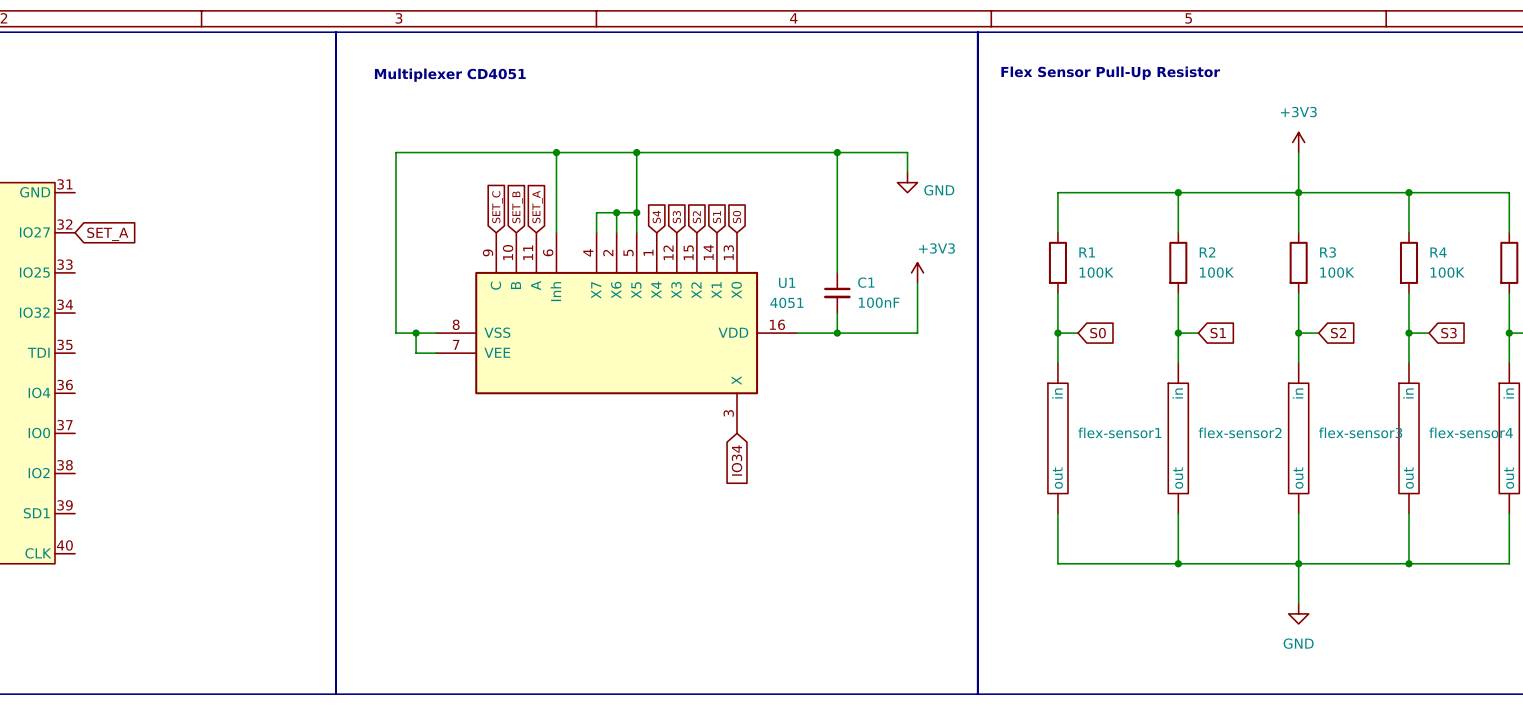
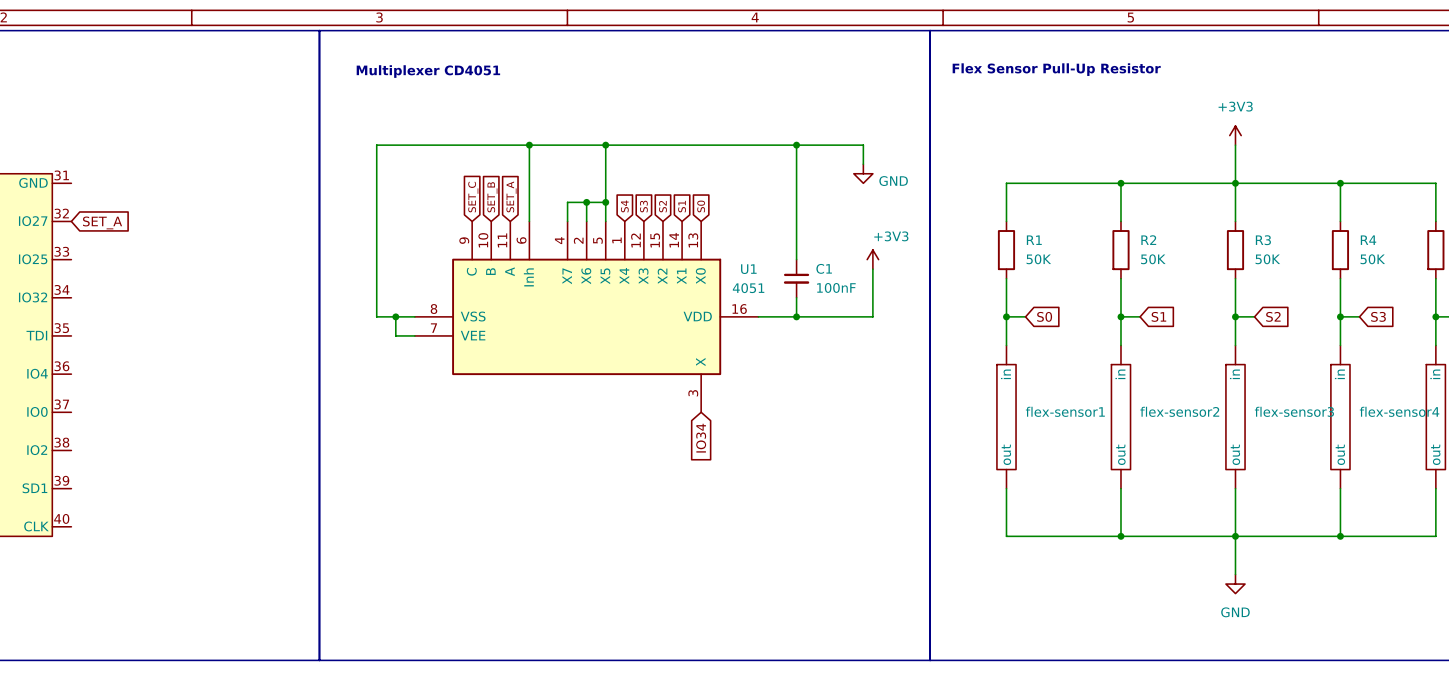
R1 value: 100K (1096, 272) -> 50K (1038, 259)
R2 value: 100K (1216, 272) -> 50K (1153, 259)
R3 value: 100K (1337, 272) -> 50K (1267, 259)
R4 value: 100K (1447, 272) -> 50K (1372, 259)

